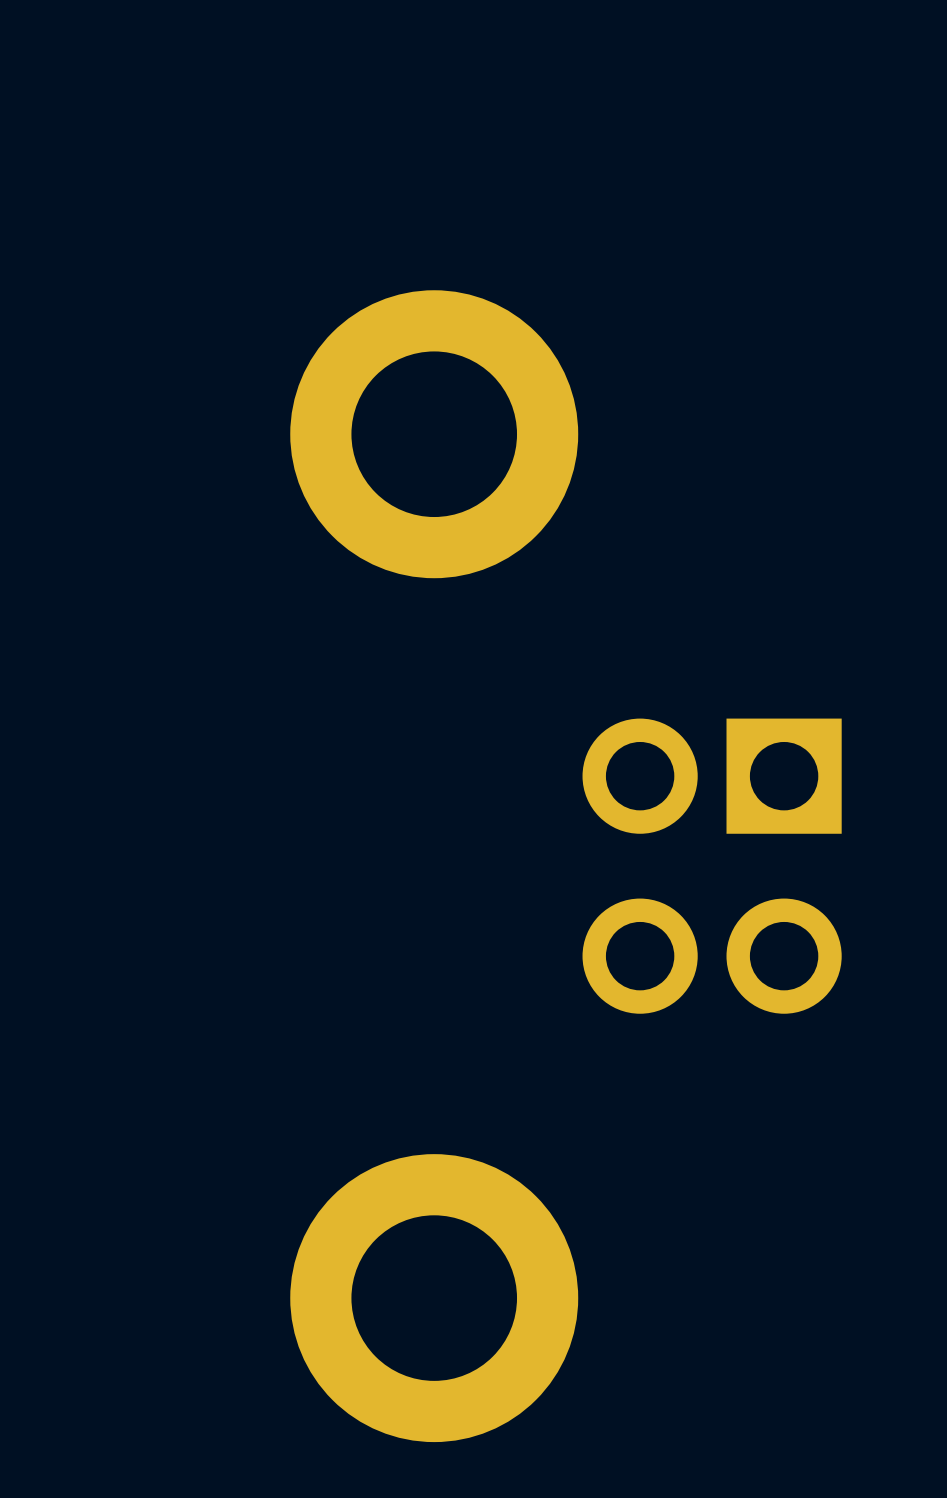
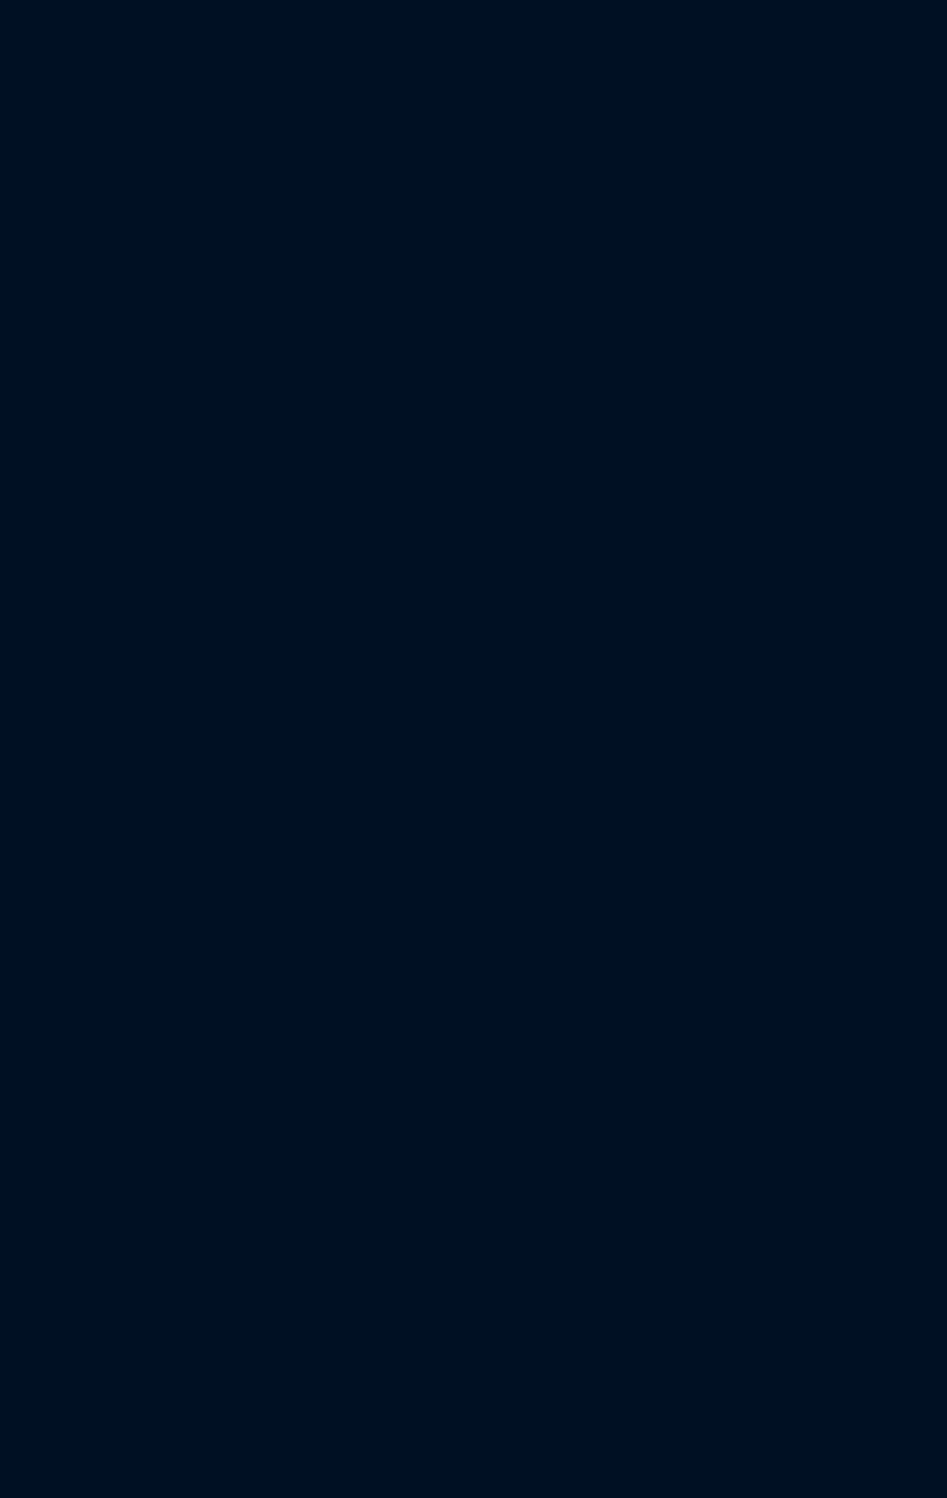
part: (565, 866) -> none

